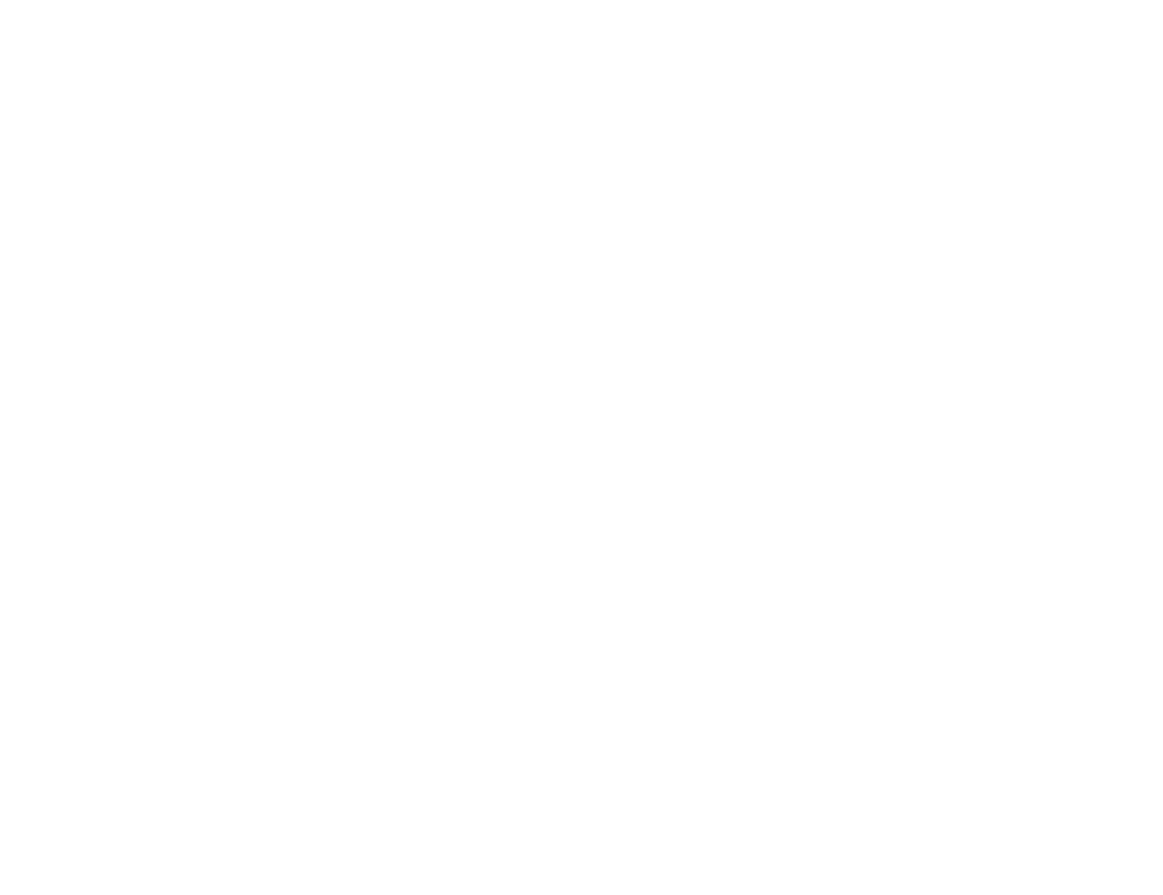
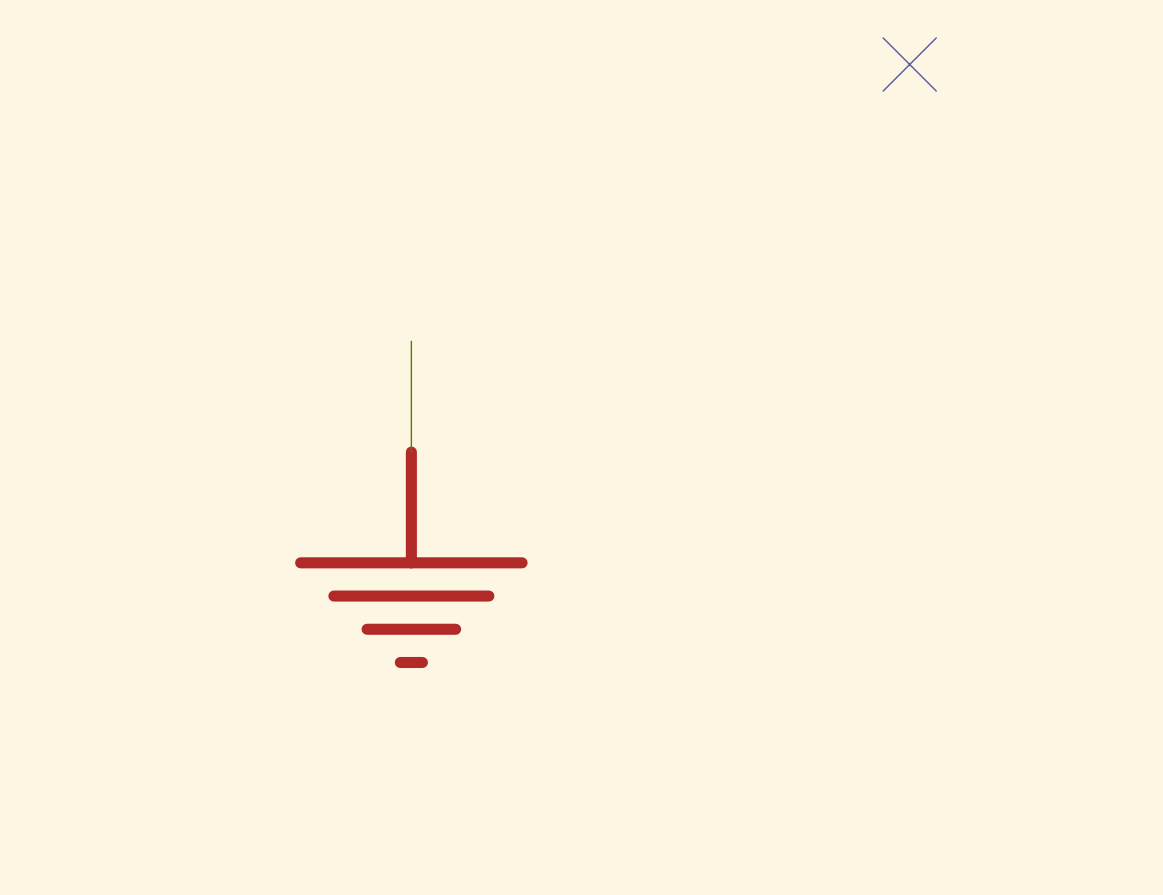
no-connect mark: none -> (909, 64)
wire: none -> (411, 341) (411, 452)
power symbol: none -> (411, 557)

